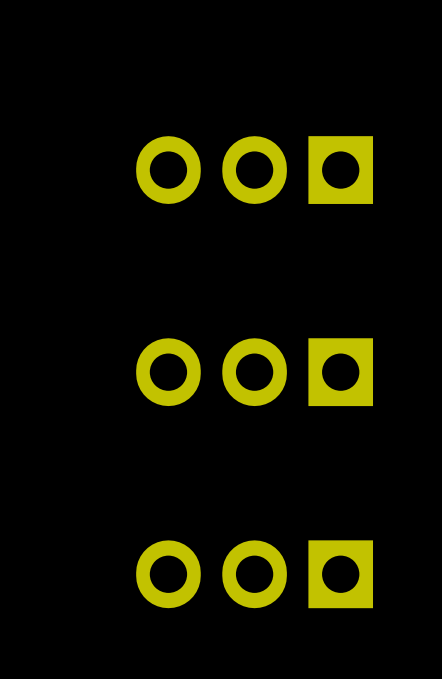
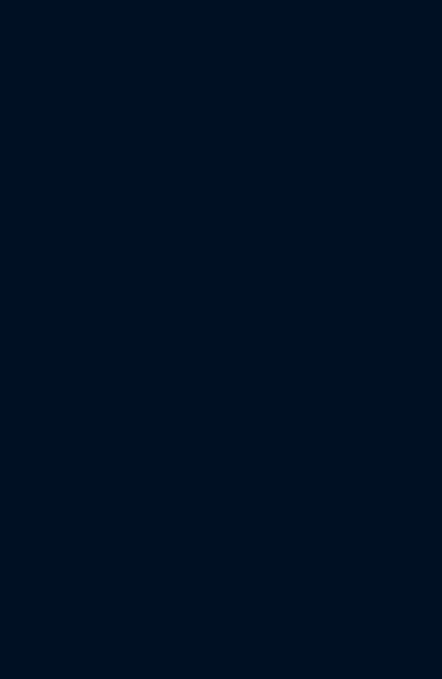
part: (254, 170) -> none
part: (254, 372) -> none
part: (254, 574) -> none

